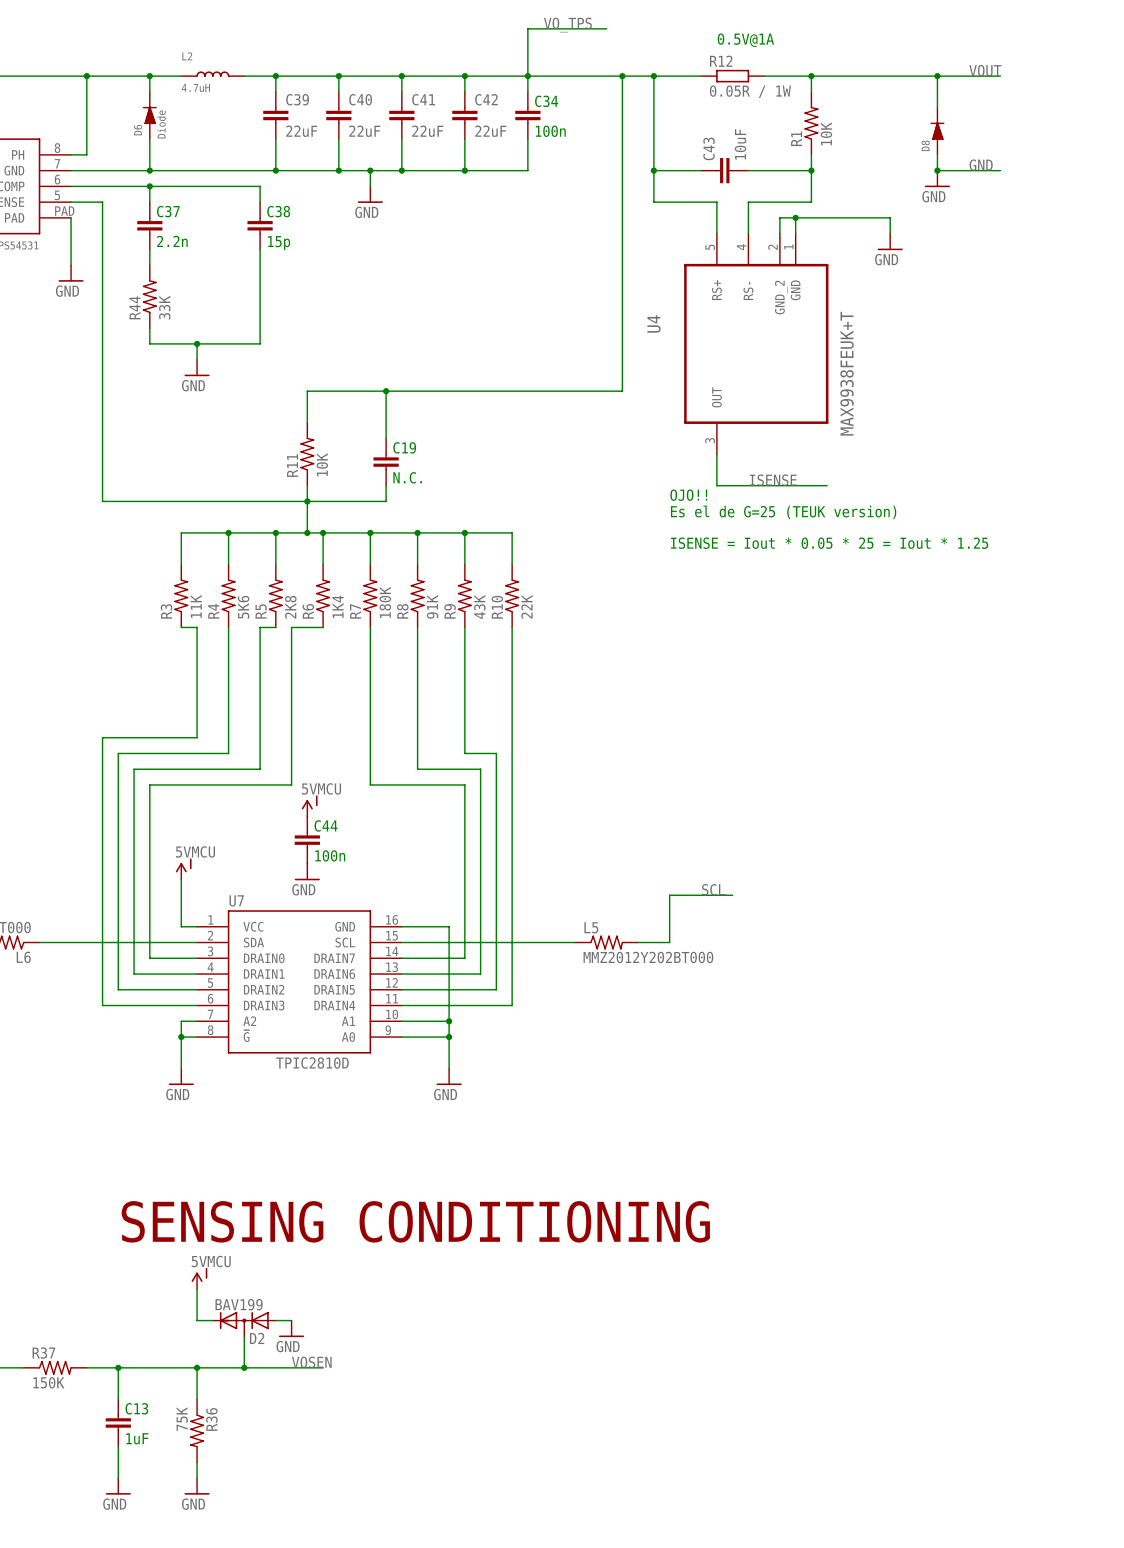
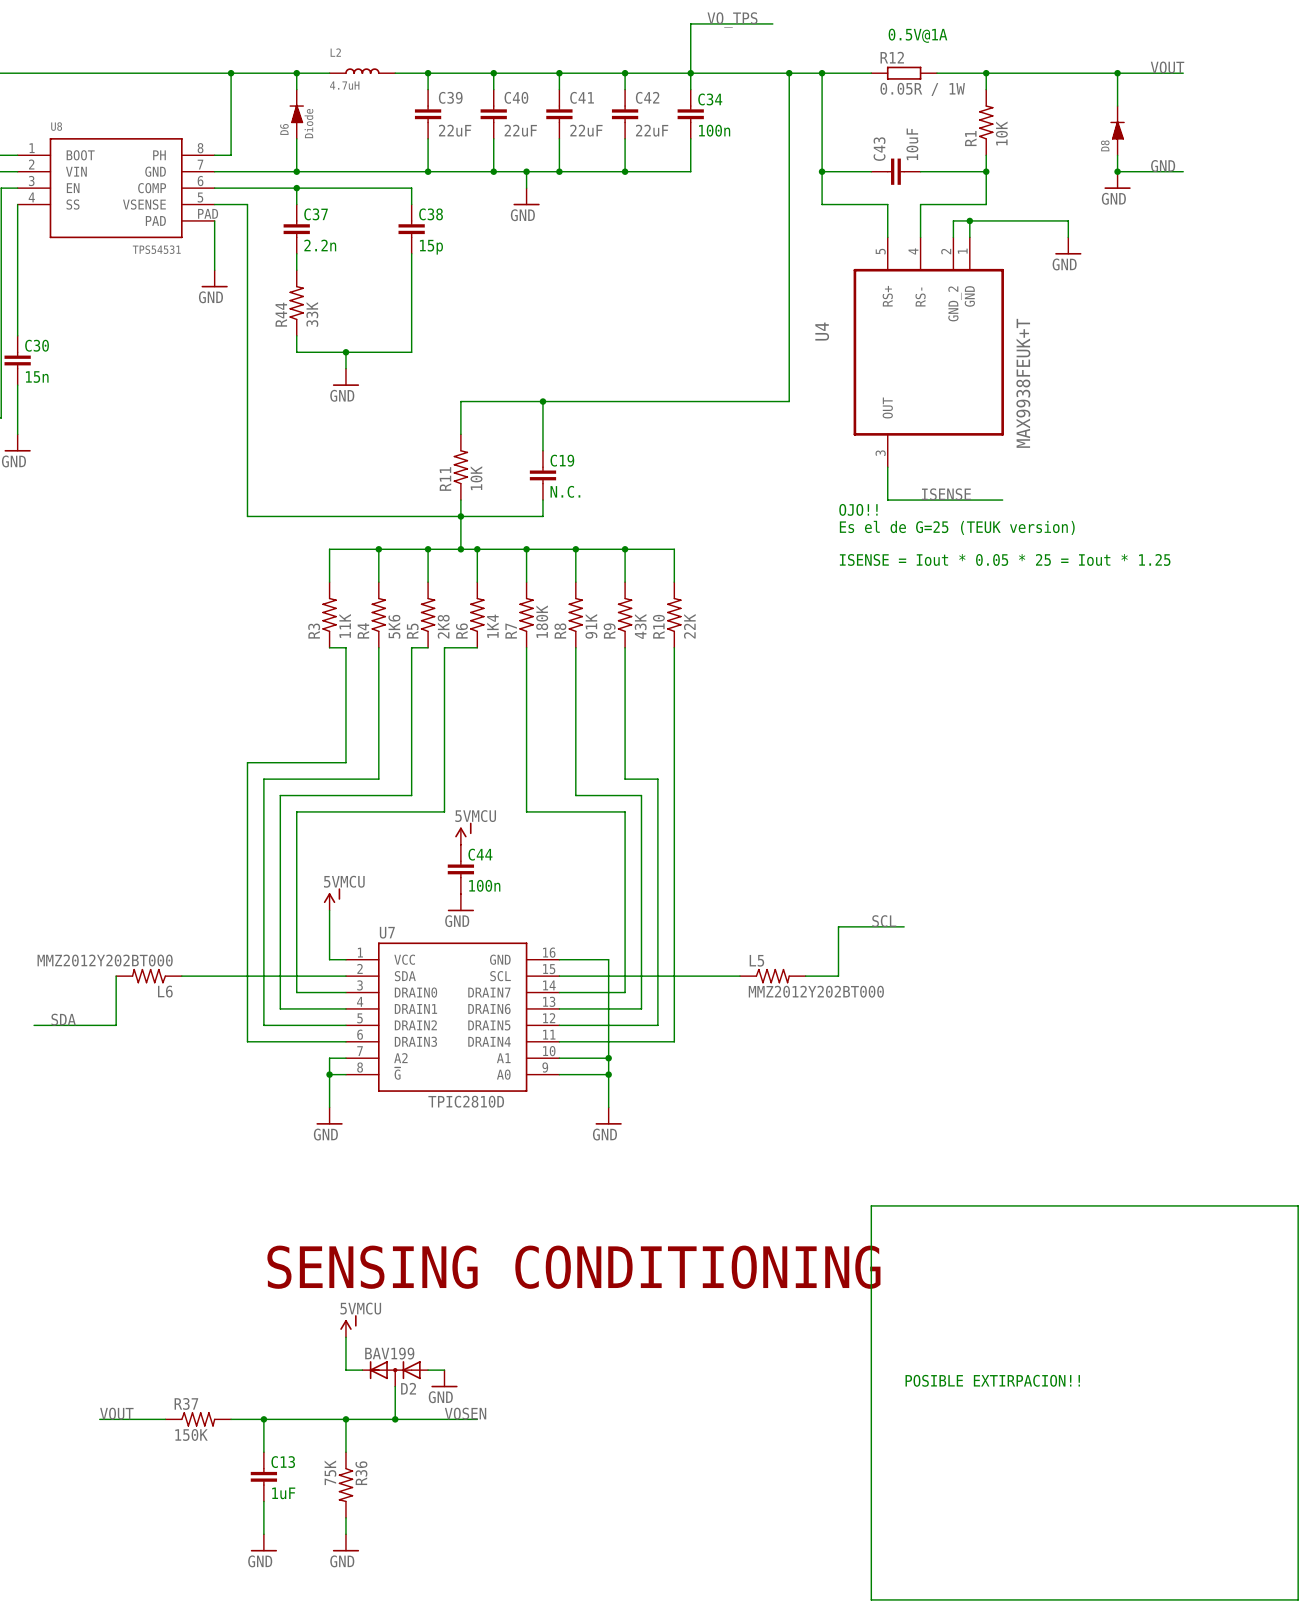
wire: none -> (871, 1205) (1298, 1205) (1298, 1599) (871, 1599) (871, 1205)
text: none -> POSIBLE EXTIRPACION!! (992, 1380)

